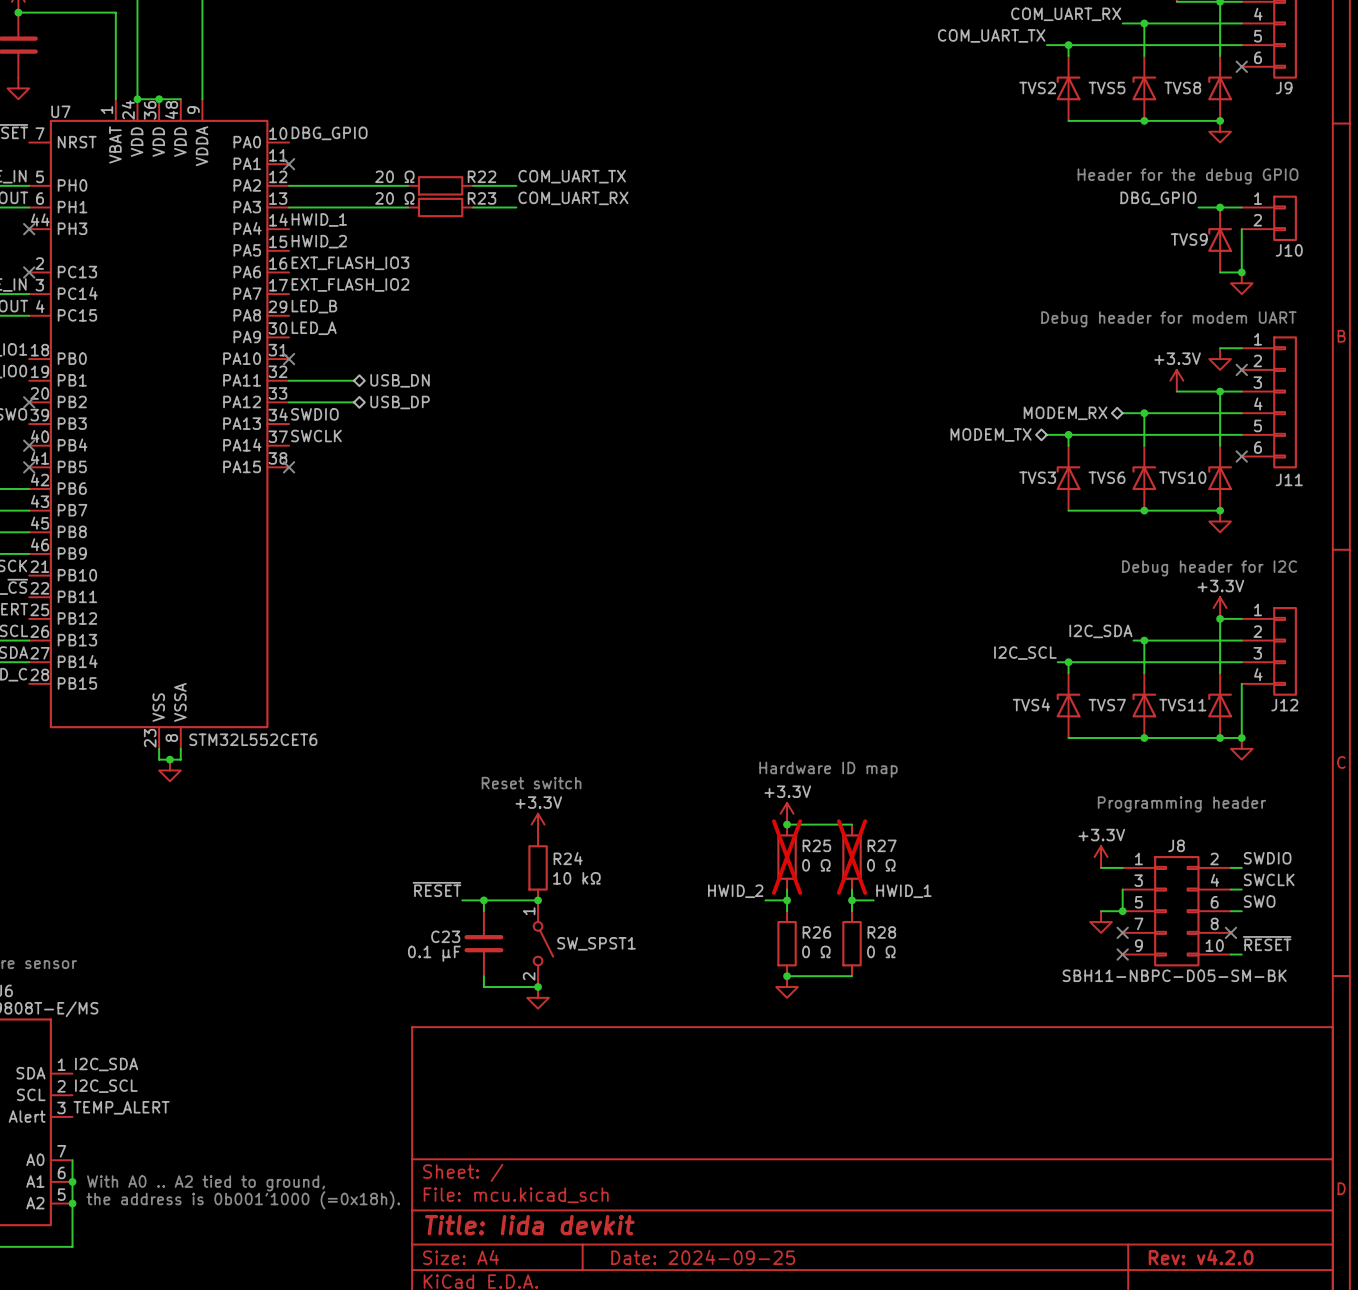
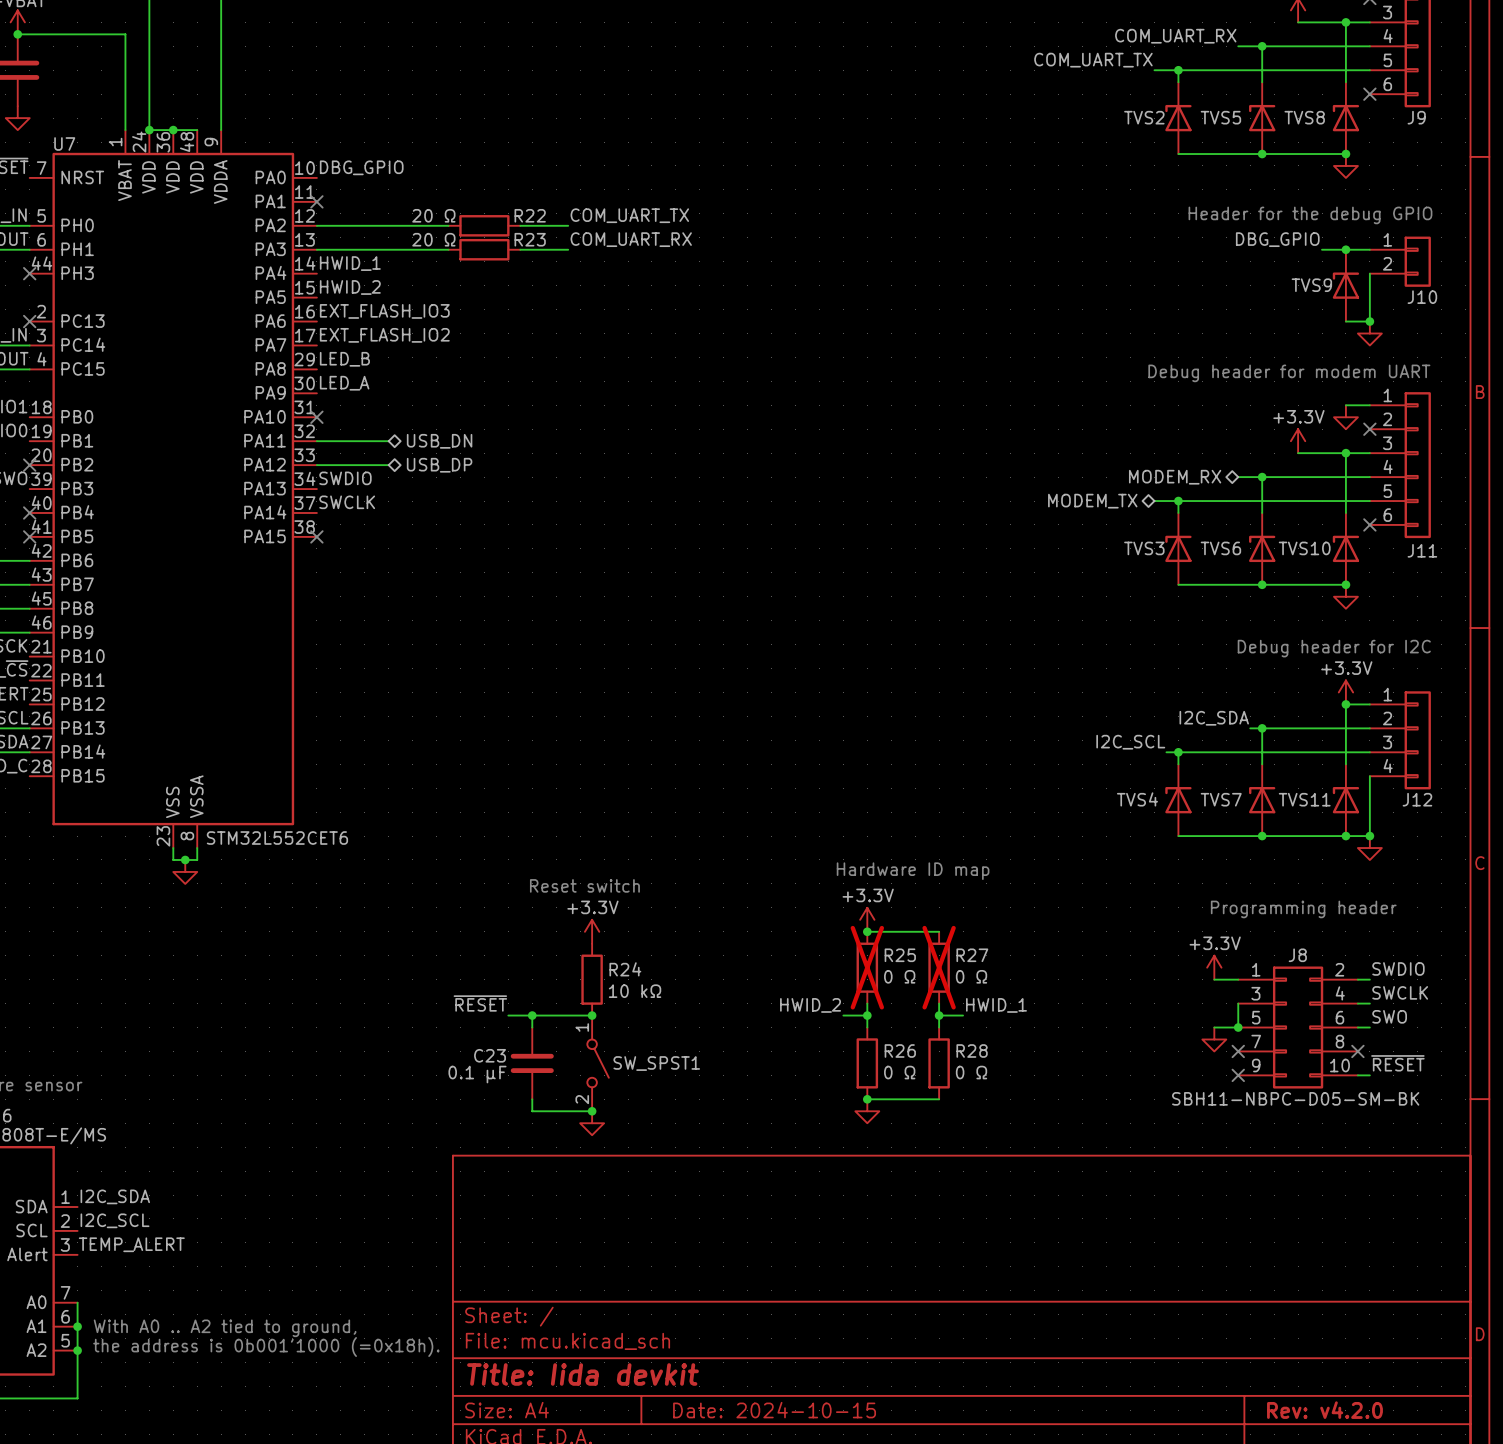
title block: Date: 2024-09-25 (703, 1257) -> Date: 2024-10-15 (774, 1410)

